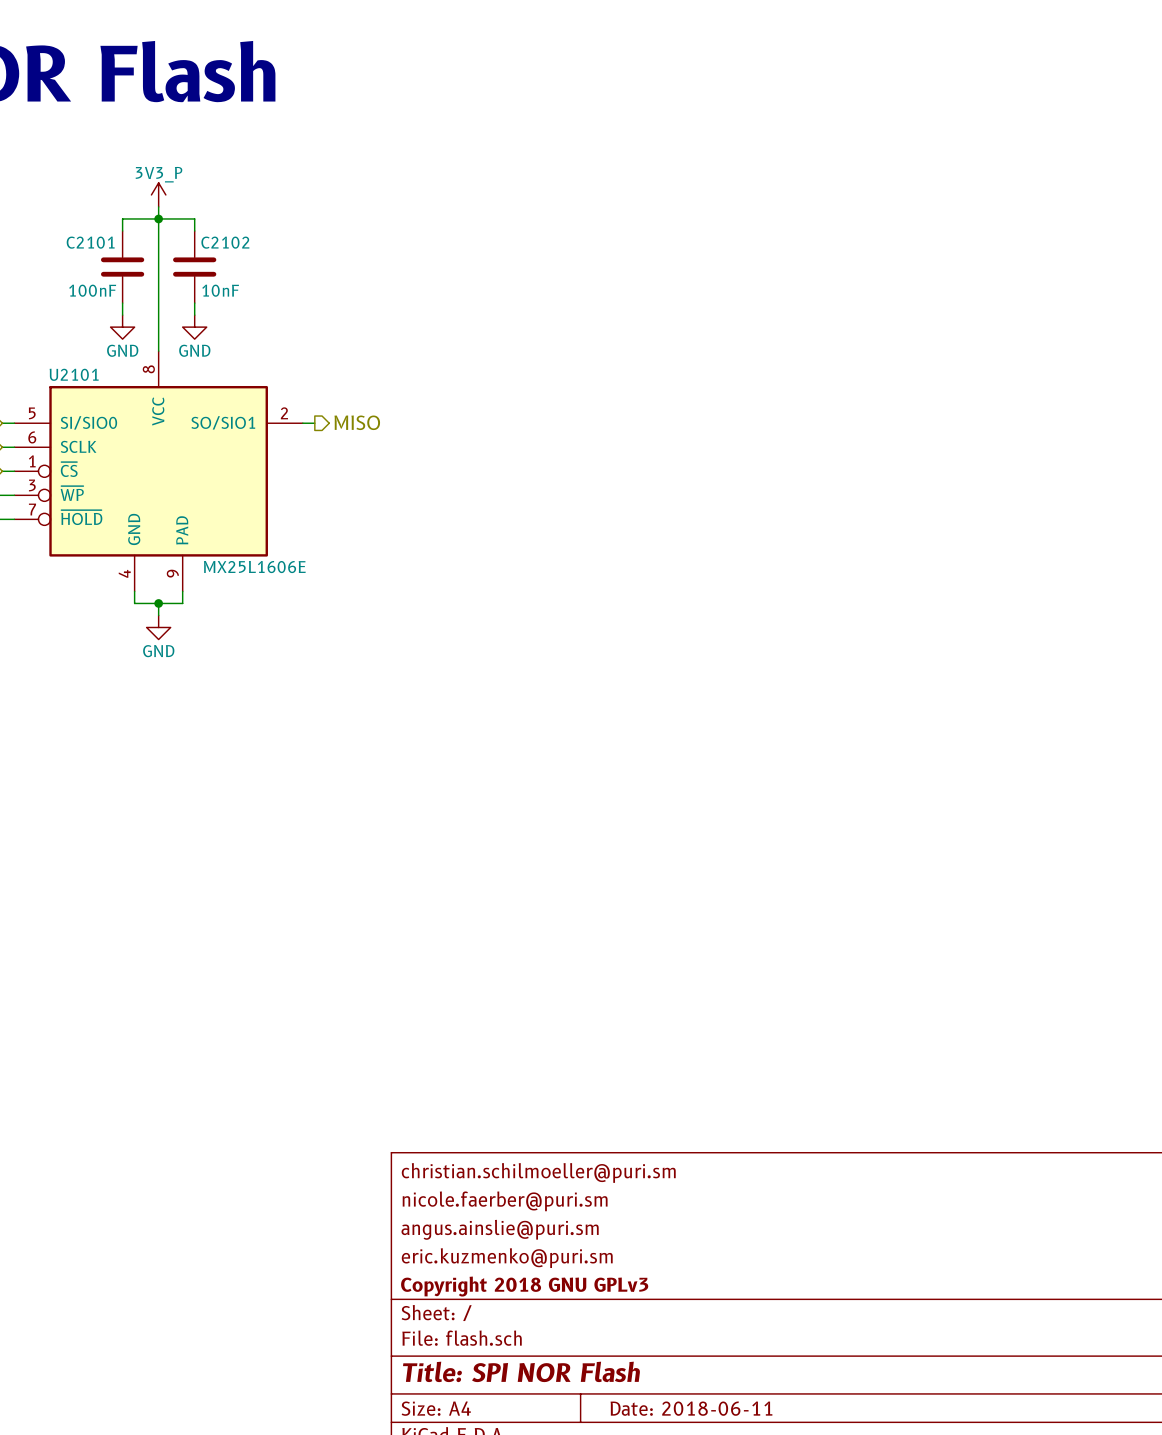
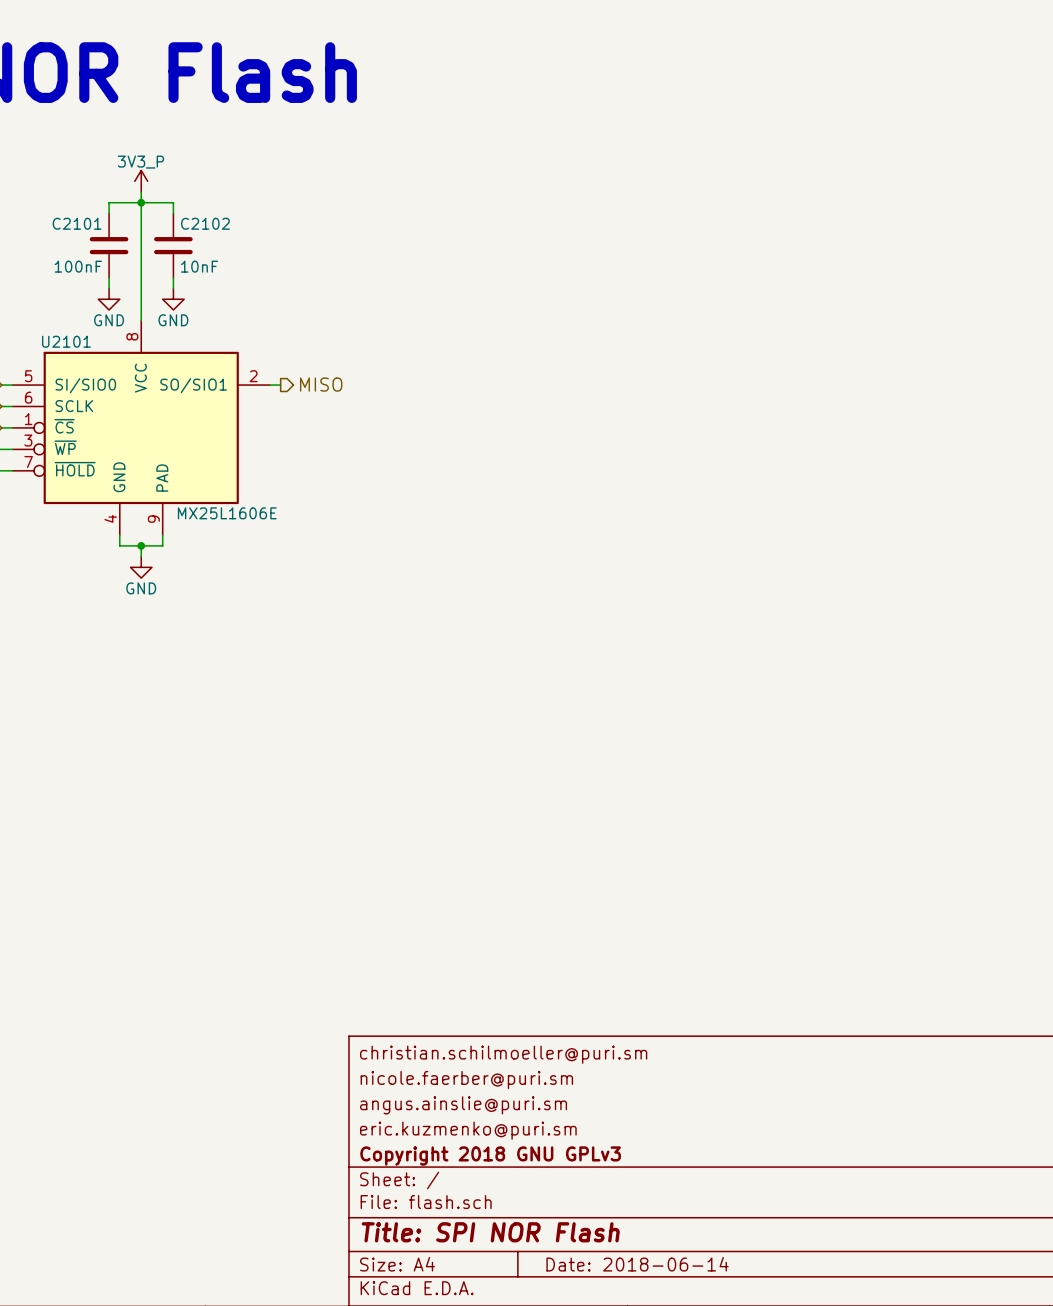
title block: Date: 2018-06-11 (691, 1408) -> Date: 2018-06-14 (637, 1264)

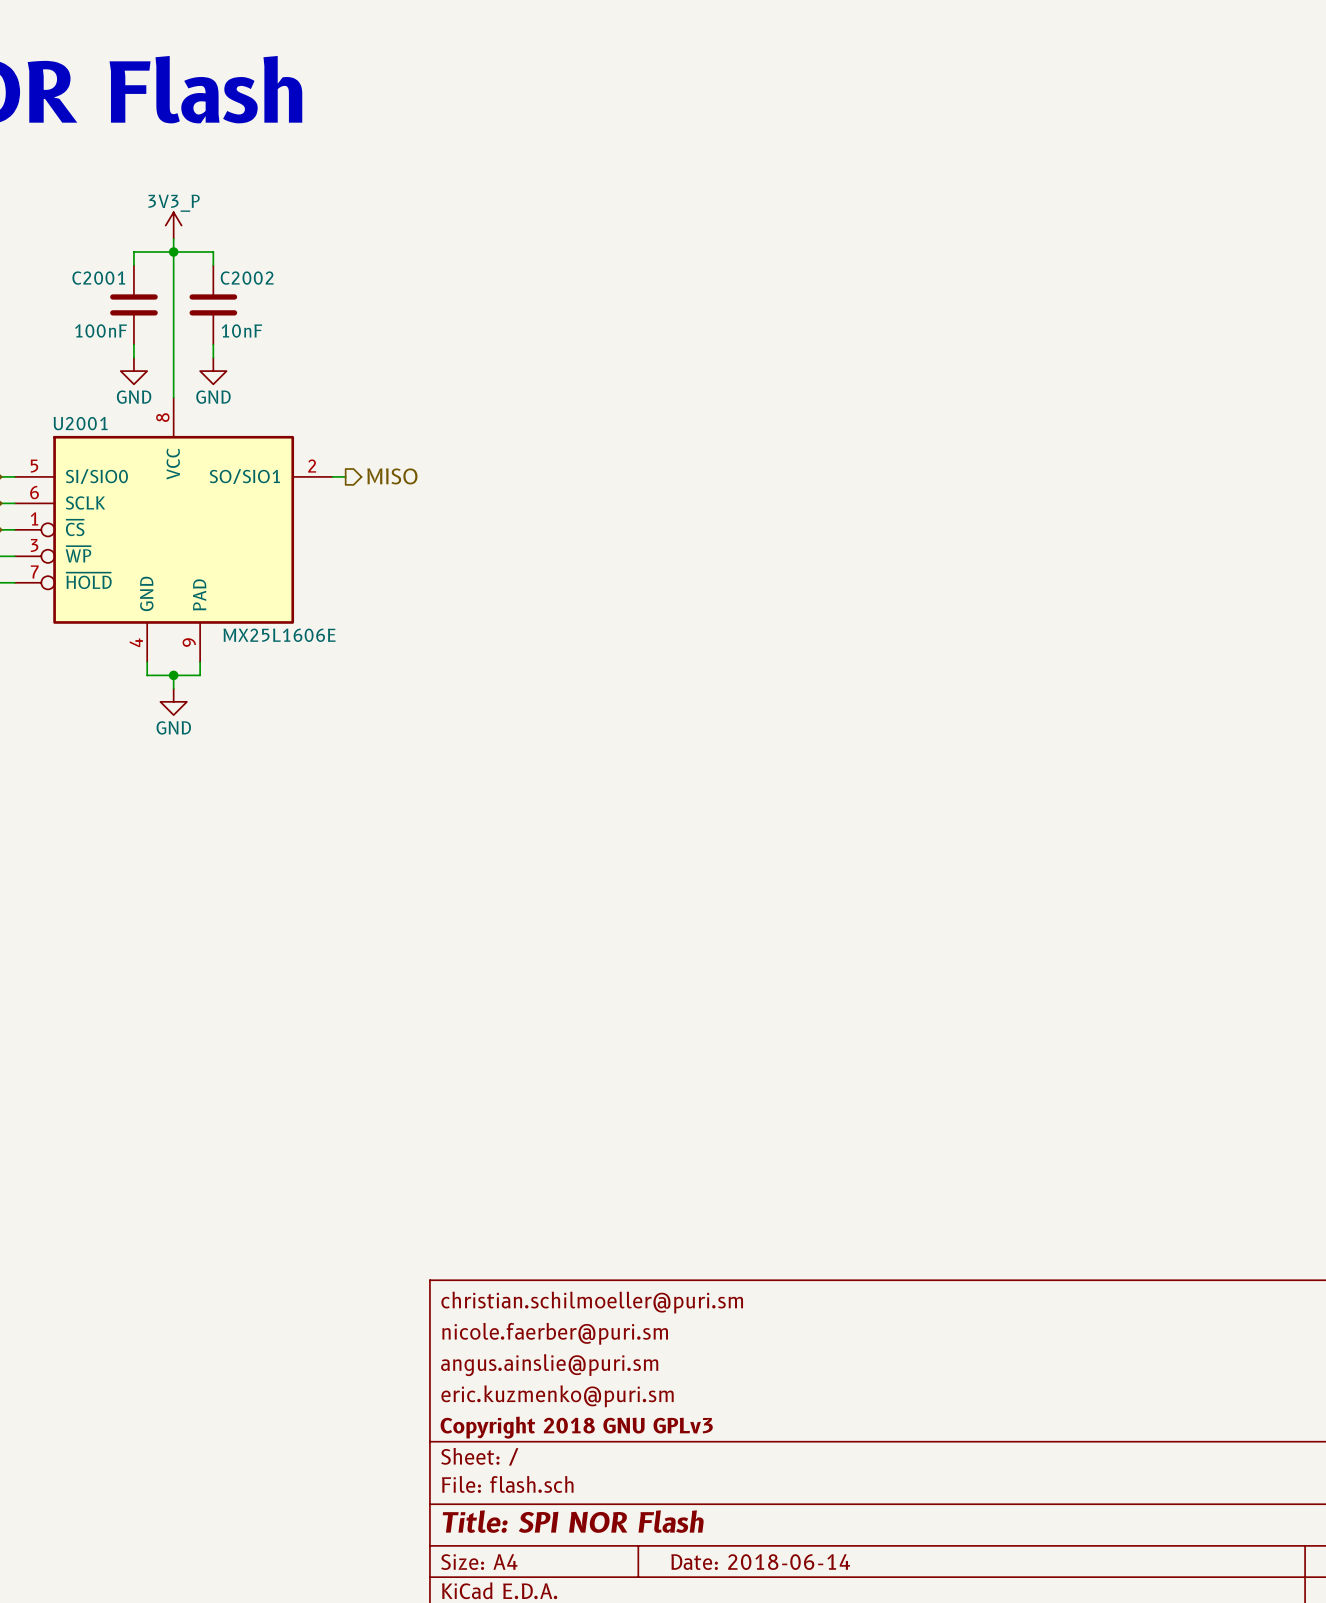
C2101 name: C2101 (77, 223) -> C2001 (98, 278)
C2102 name: C2102 (205, 223) -> C2002 (247, 278)
U2101 name: U2101 (66, 341) -> U2001 (80, 423)

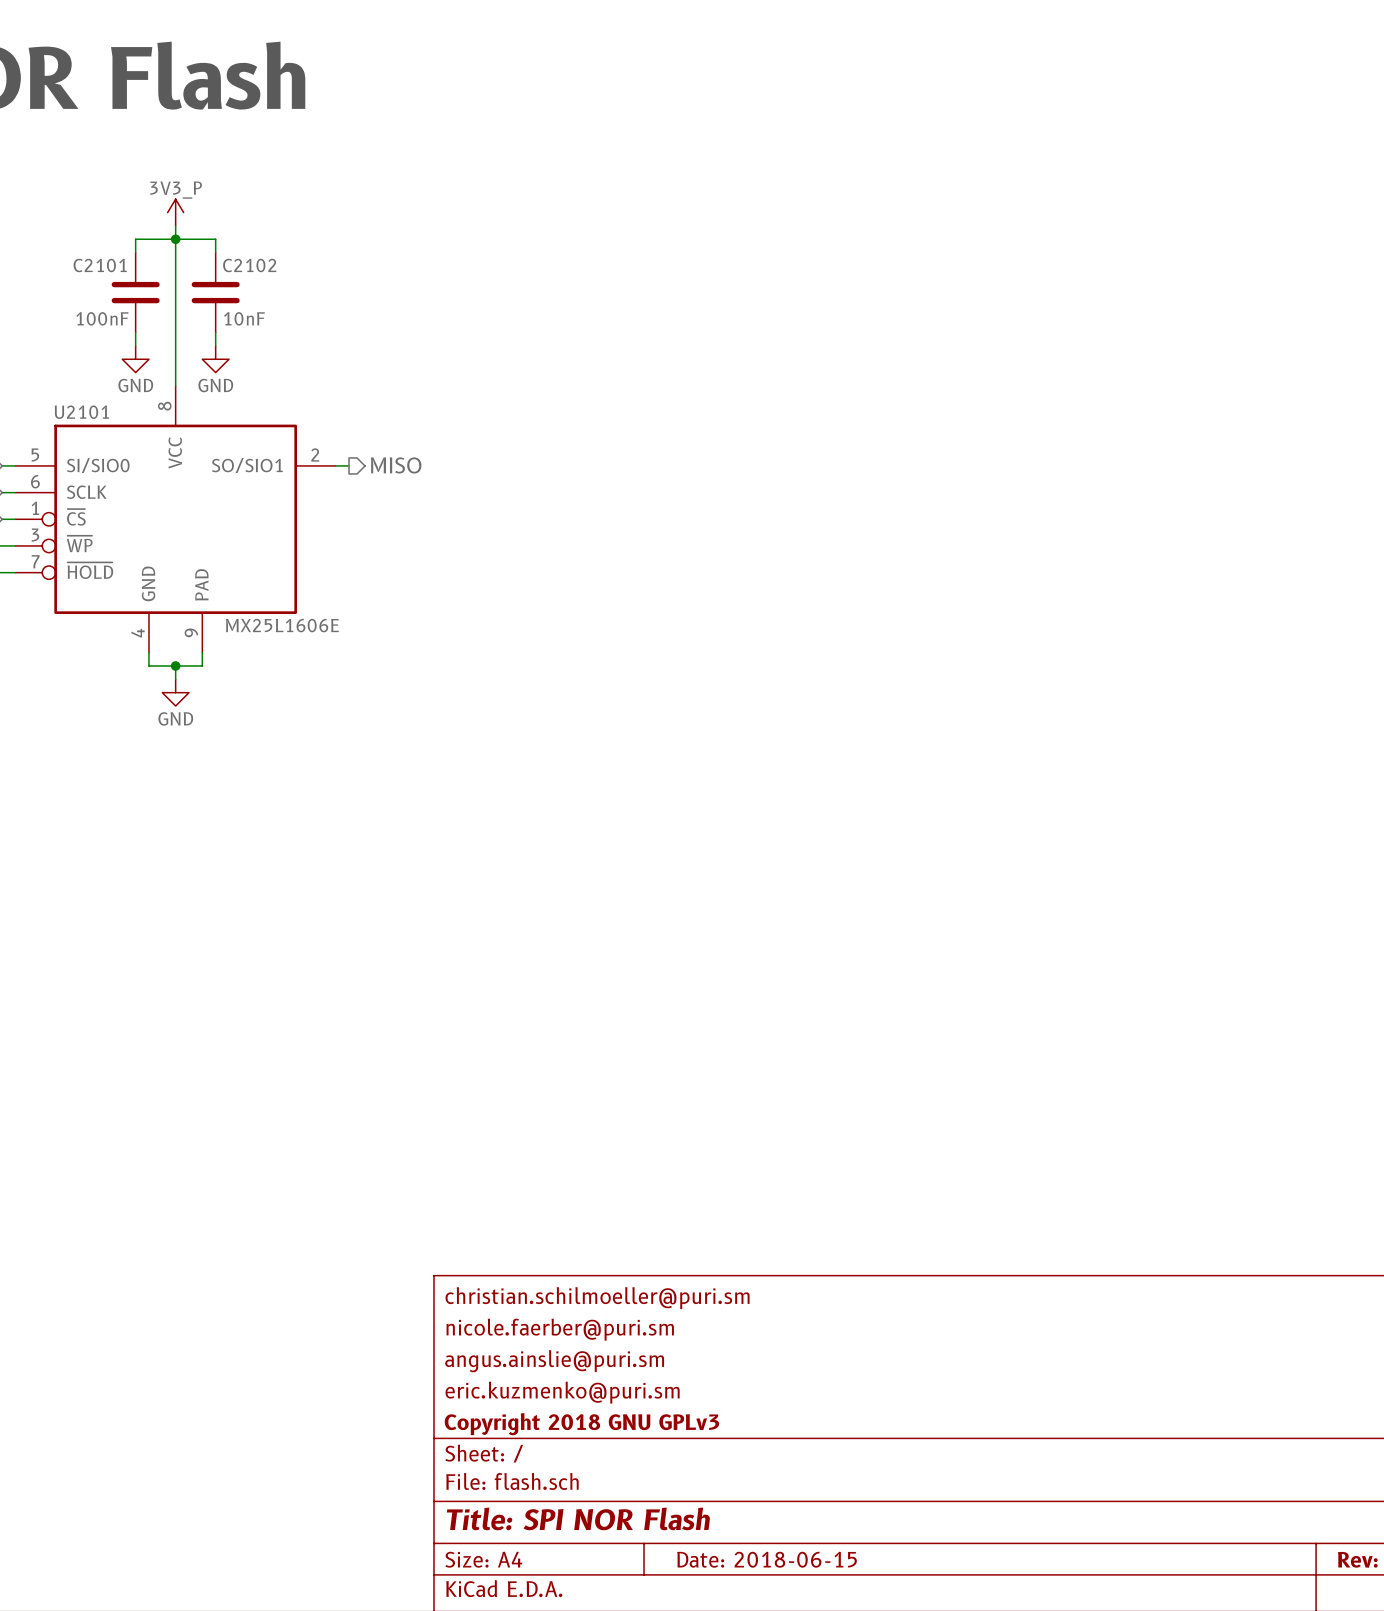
C2001 name: C2001 (98, 278) -> C2101 (100, 265)
C2002 name: C2002 (247, 278) -> C2102 (249, 265)
U2001 name: U2001 (80, 423) -> U2101 (81, 412)
title block: Date: 2018-06-14 (760, 1562) -> Date: 2018-06-15 (767, 1559)

